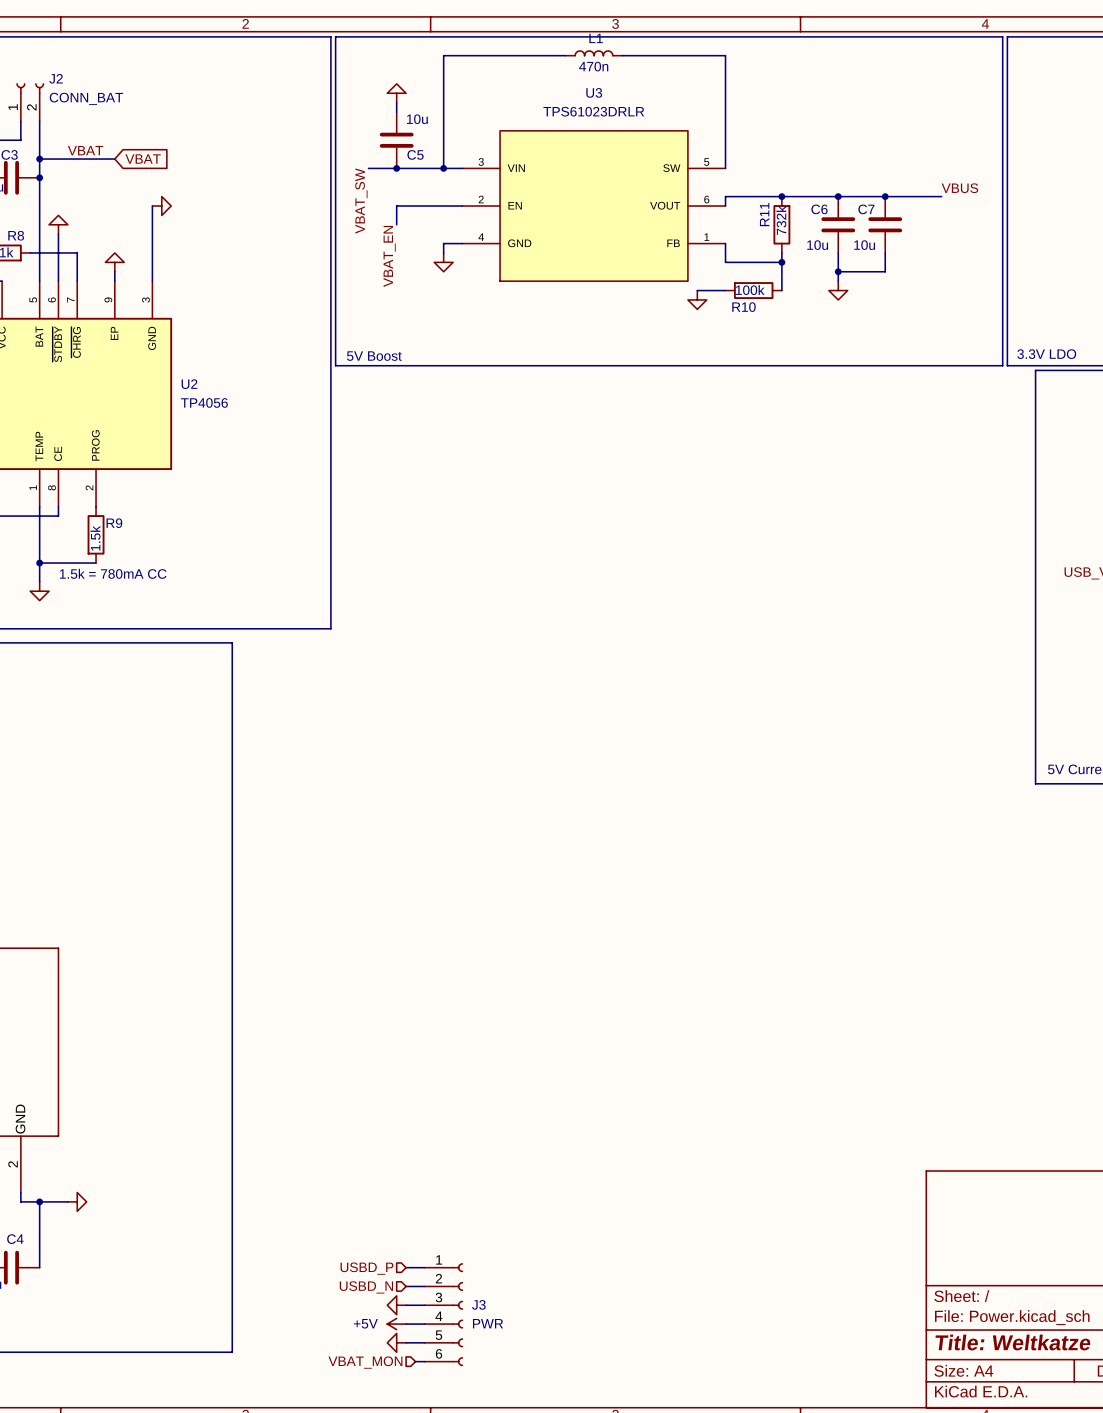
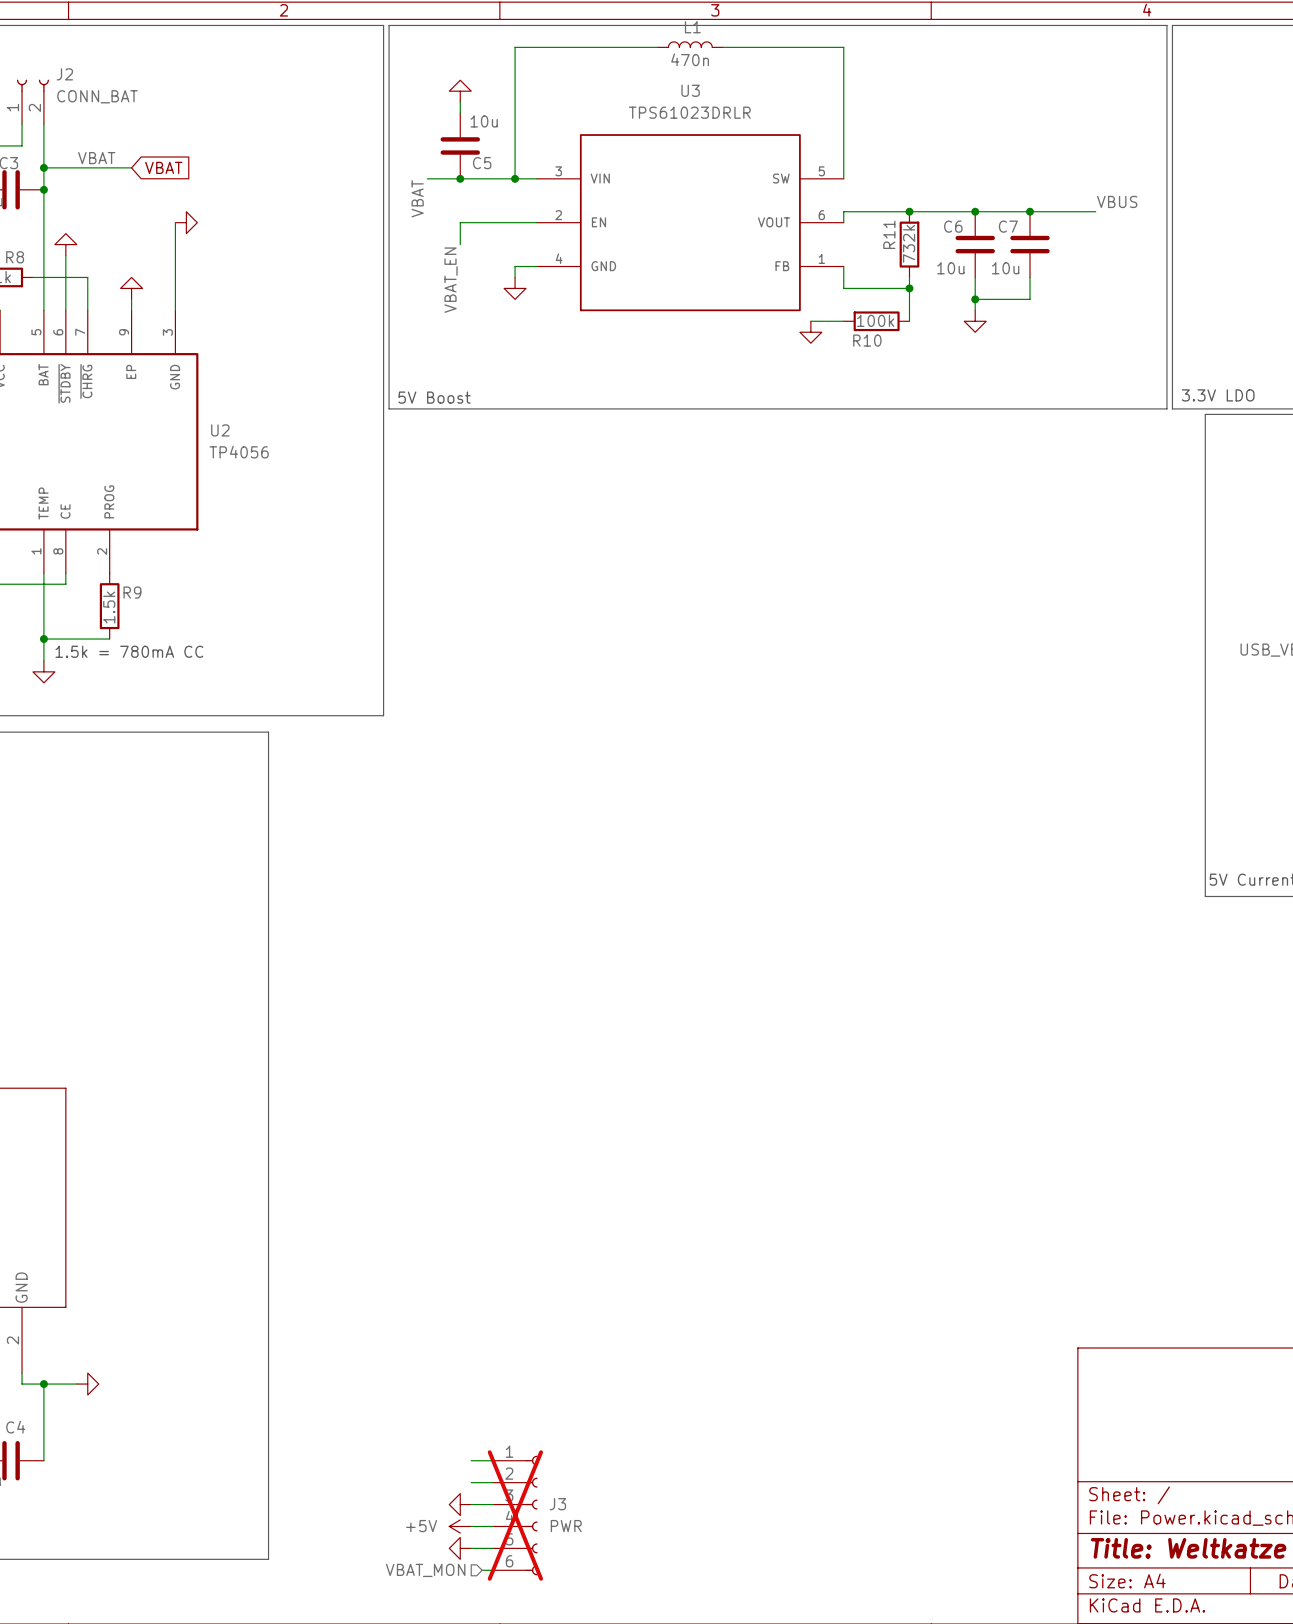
label: VBAT_SW (361, 201) -> VBAT (417, 198)
hierarchical label: USBD_P (366, 1268) -> none
hierarchical label: USBD_N (366, 1287) -> none
J3 do-not-place cross: none -> (515, 1515)

